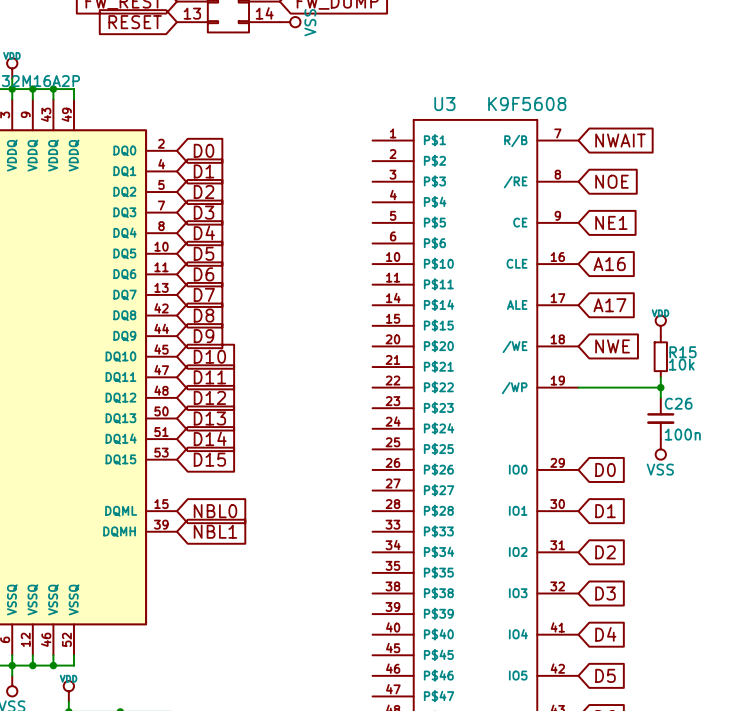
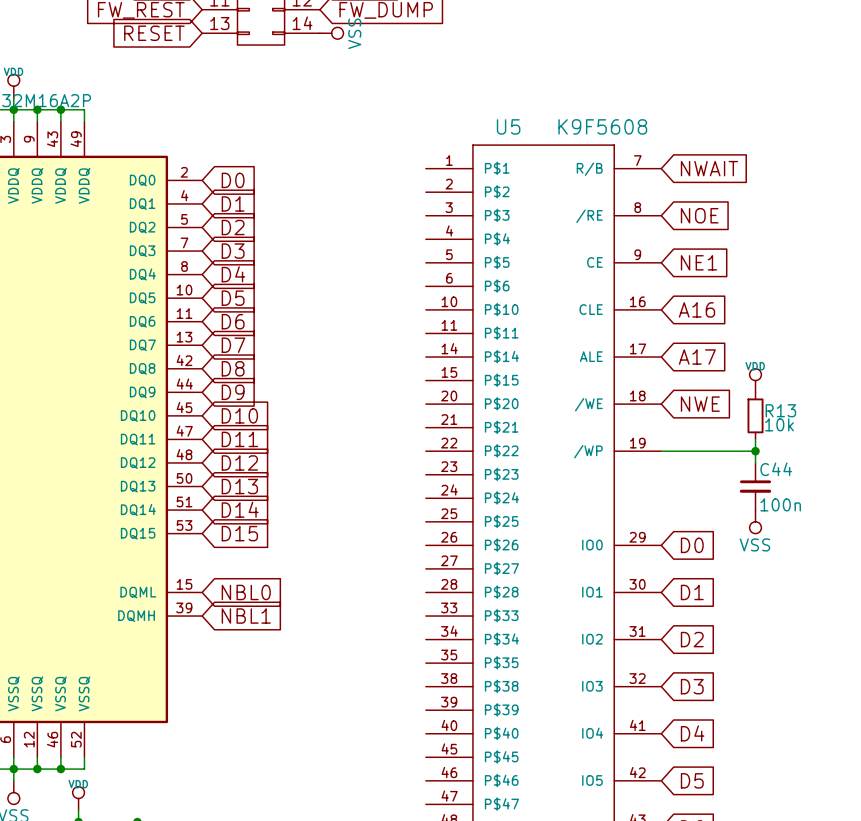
U3 name: U3 (444, 104) -> U5 (508, 126)
R15 name: R15 (682, 352) -> R13 (780, 410)
C26 name: C26 (678, 403) -> C44 (776, 469)

